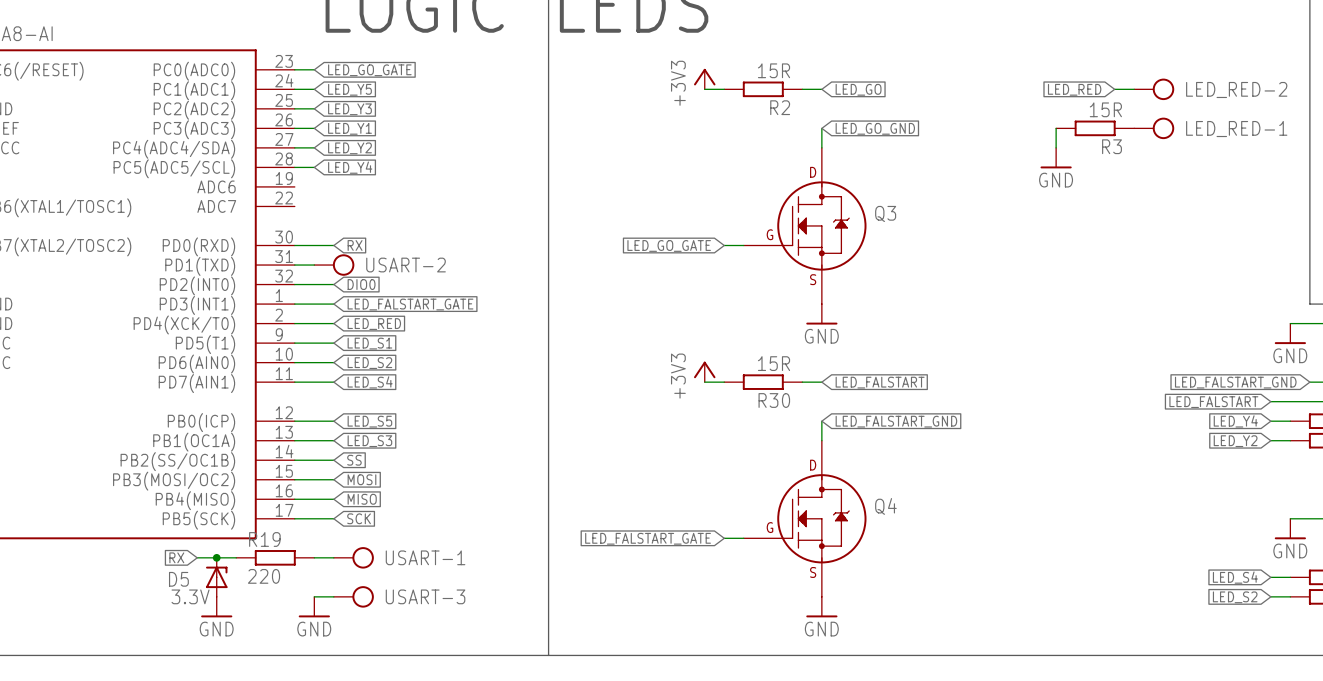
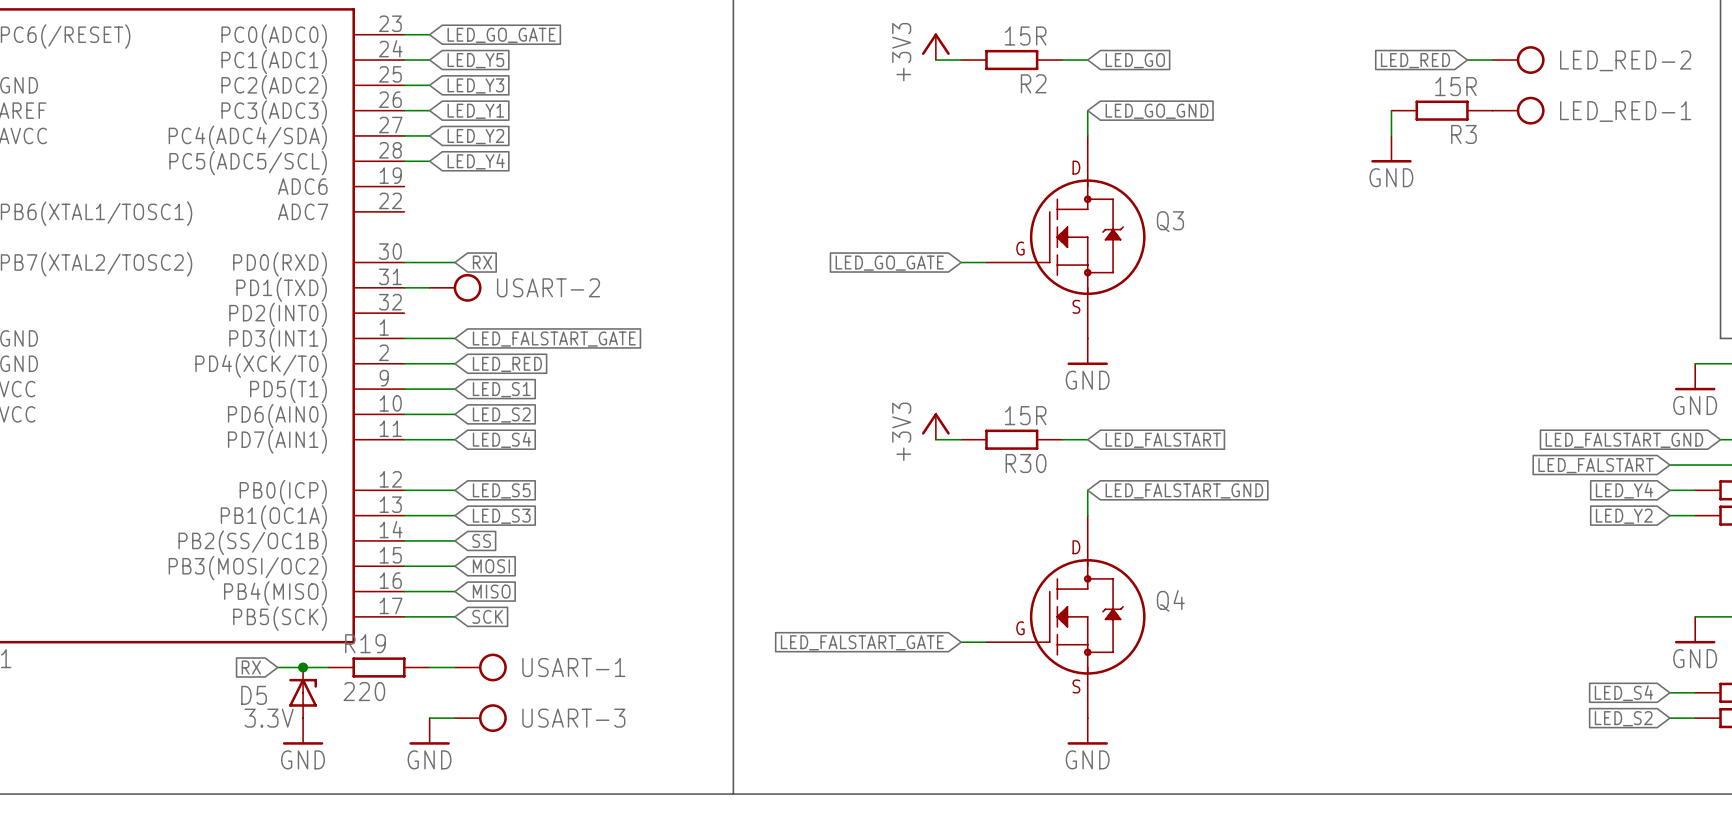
wire: (294, 284) (333, 284) -> none
global label: DIO0 (361, 284) -> none

